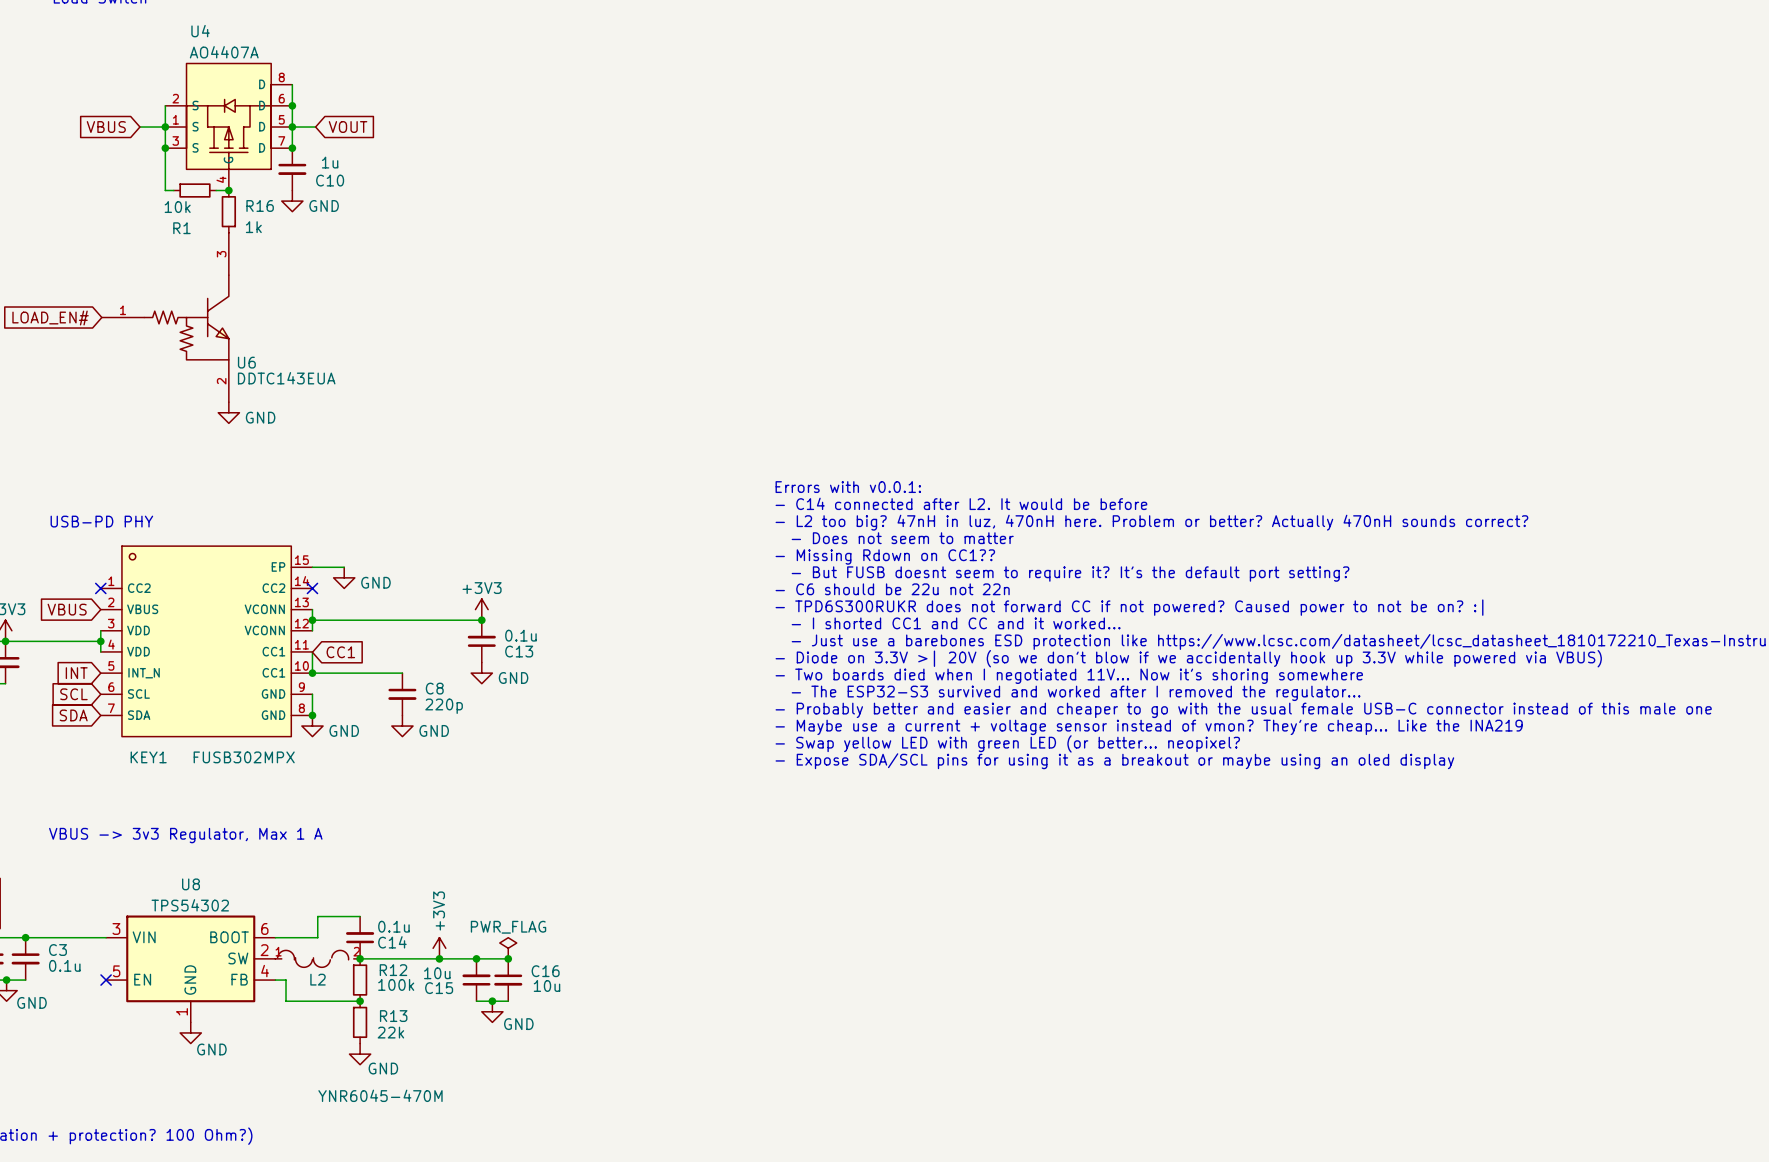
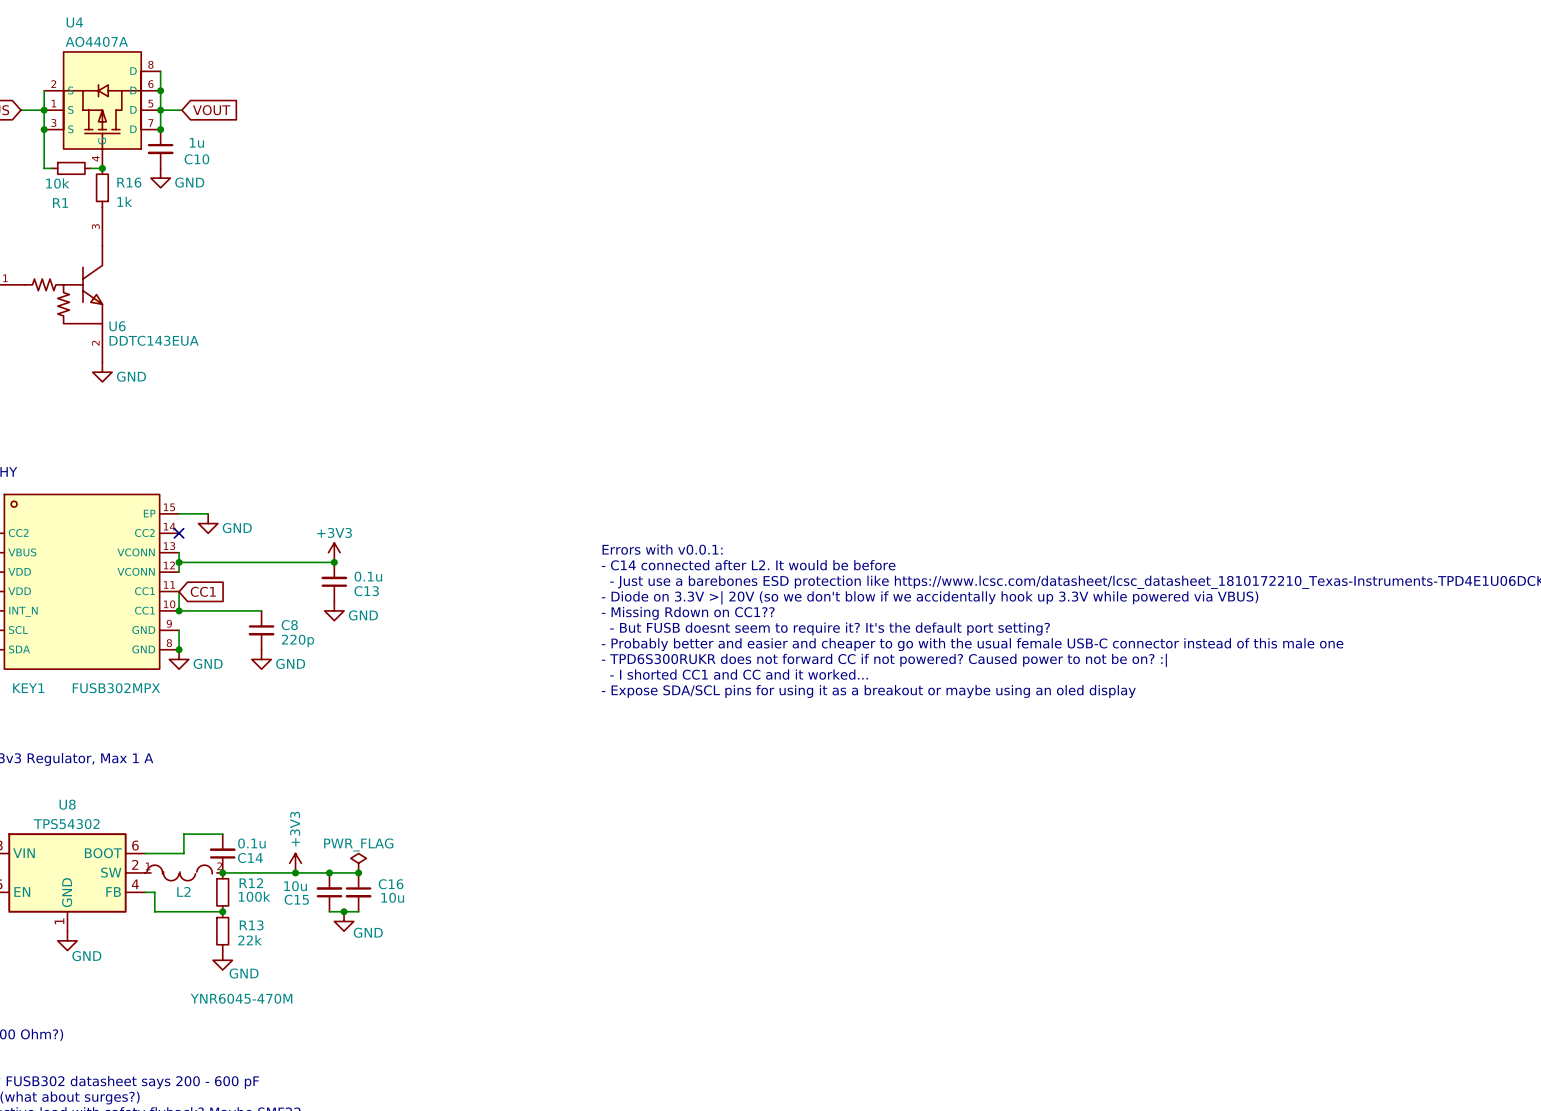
text: Errors with v0.0.1: (848, 487) -> none
text: - C14 connected after L2. It would be before (961, 503) -> none
text: - L2 too big? 47nH in luz, 470nH here. Problem or better? Actually 470nH sounds correct? (1151, 522) -> none
text: - Does not seem to matter (902, 538) -> none
text: - Missing Rdown on CC1?? (885, 556) -> none
text: - But FUSB doesnt seem to require it? It's the default port setting? (1070, 574) -> none
text: - C6 should be 22u not 22n (892, 589) -> none
text: - TPD6S300RUKR does not forward CC if not powered? Caused power to not be on? :| (1129, 607) -> Errors with v0.0.1: (662, 549)
text: - I shorted CC1 and CC and it worked... (956, 623) -> - C14 connected after L2. It would be before (748, 565)
text: - Two boards died when I negotiated 11V... Now it's shoring somewhere (1069, 676) -> - Missing Rdown on CC1?? (688, 613)
text: - The ESP32-S3 survived and worked after I removed the regulator... (1076, 693) -> - But FUSB doesnt seem to require it? It's the default port setting? (830, 629)
text: - Maybe use a current + voltage sensor instead of vmon? They're cheap... Like the INA219 (1149, 727) -> - TPD6S300RUKR does not forward CC if not powered? Caused power to not be on? :| (884, 660)
text: - Swap yellow LED with green LED (or better... neopixel? (1007, 743) -> - I shorted CC1 and CC and it worked... (739, 674)

